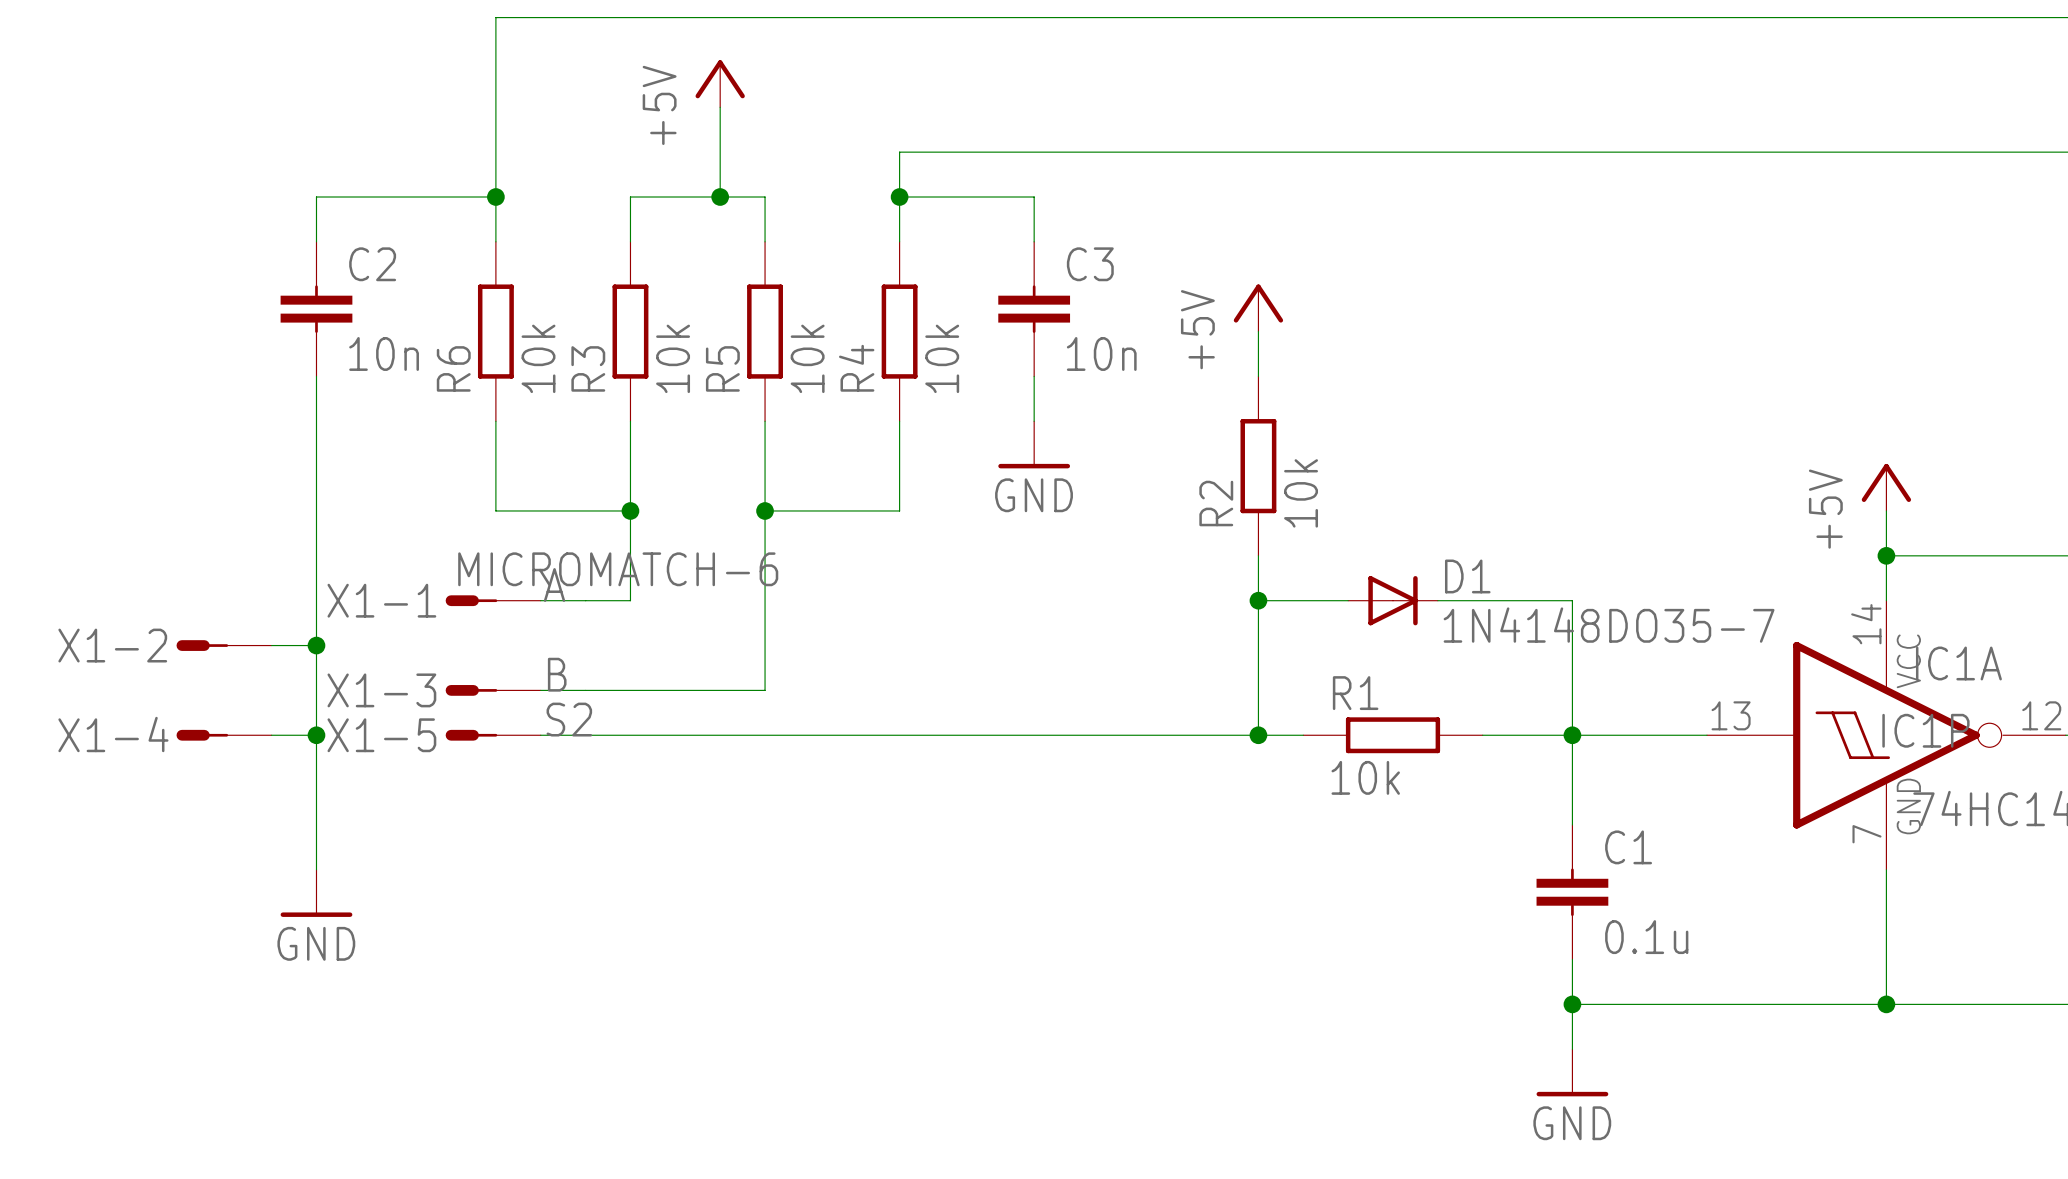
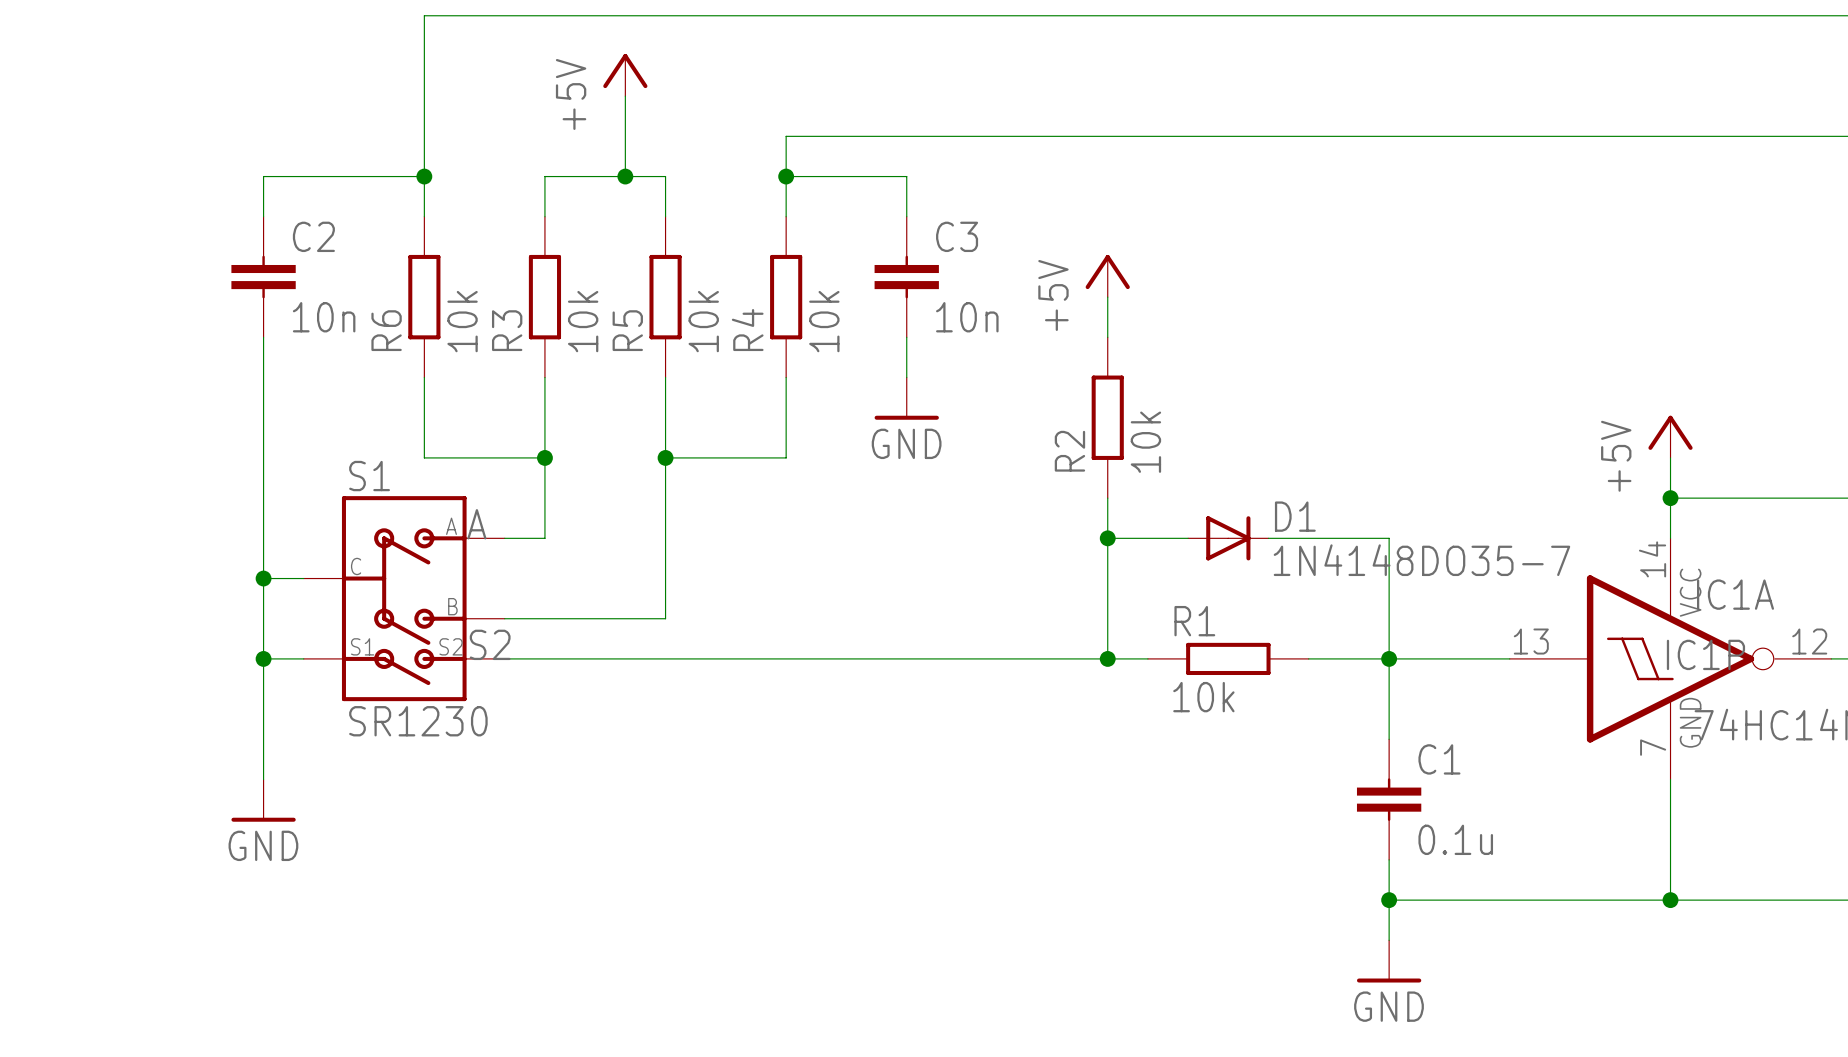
X1-1: MICROMATCH-6 (493, 600) -> none
X1-2: (224, 645) -> none
wire: (271, 645) (316, 645) -> (303, 578) (263, 578)
S1: none -> SR1230 (404, 598)
label: B (557, 674) -> none
X1-3: (493, 690) -> none
X1-4: (224, 735) -> none
wire: (271, 735) (316, 735) -> (303, 658) (263, 658)
X1-5: (493, 735) -> none

